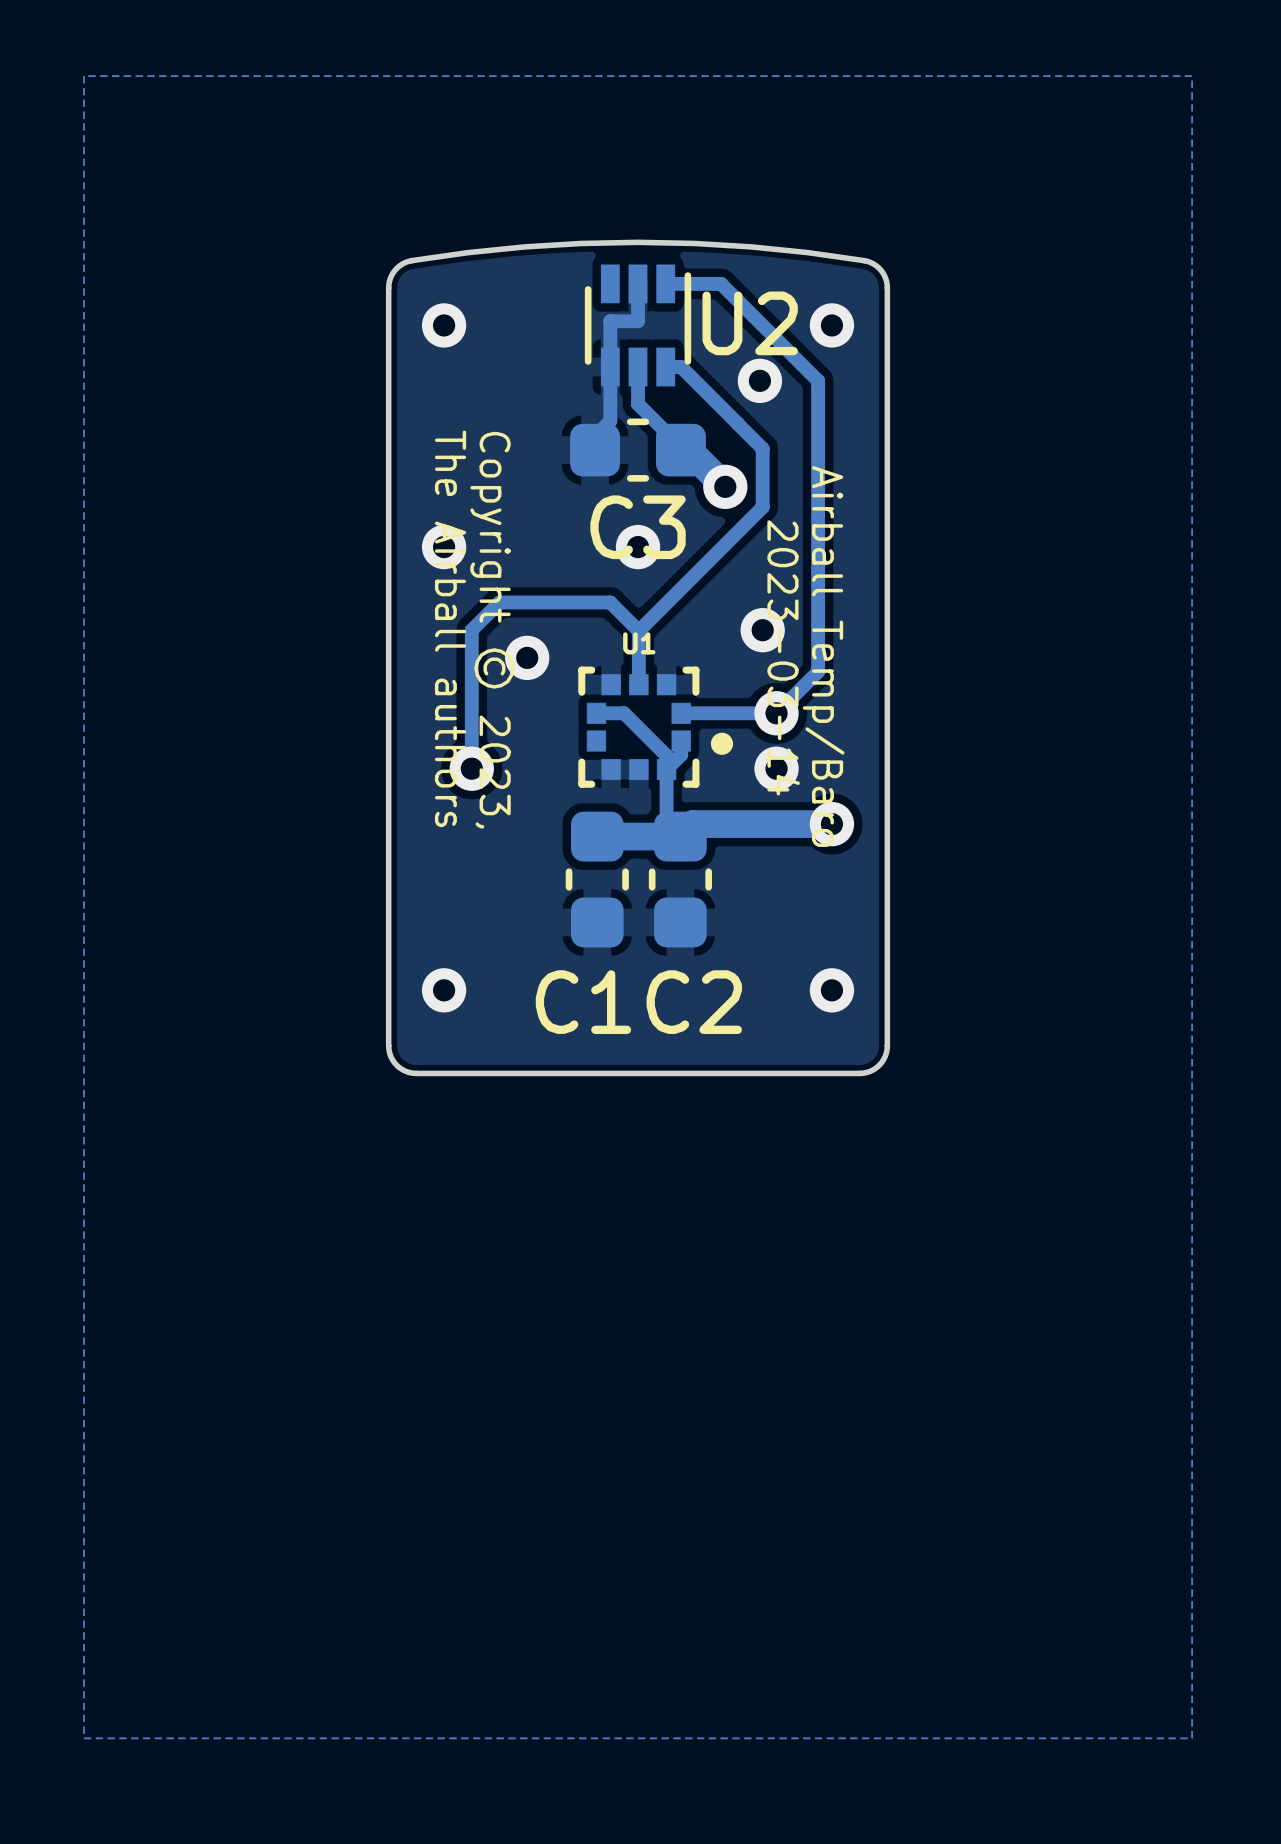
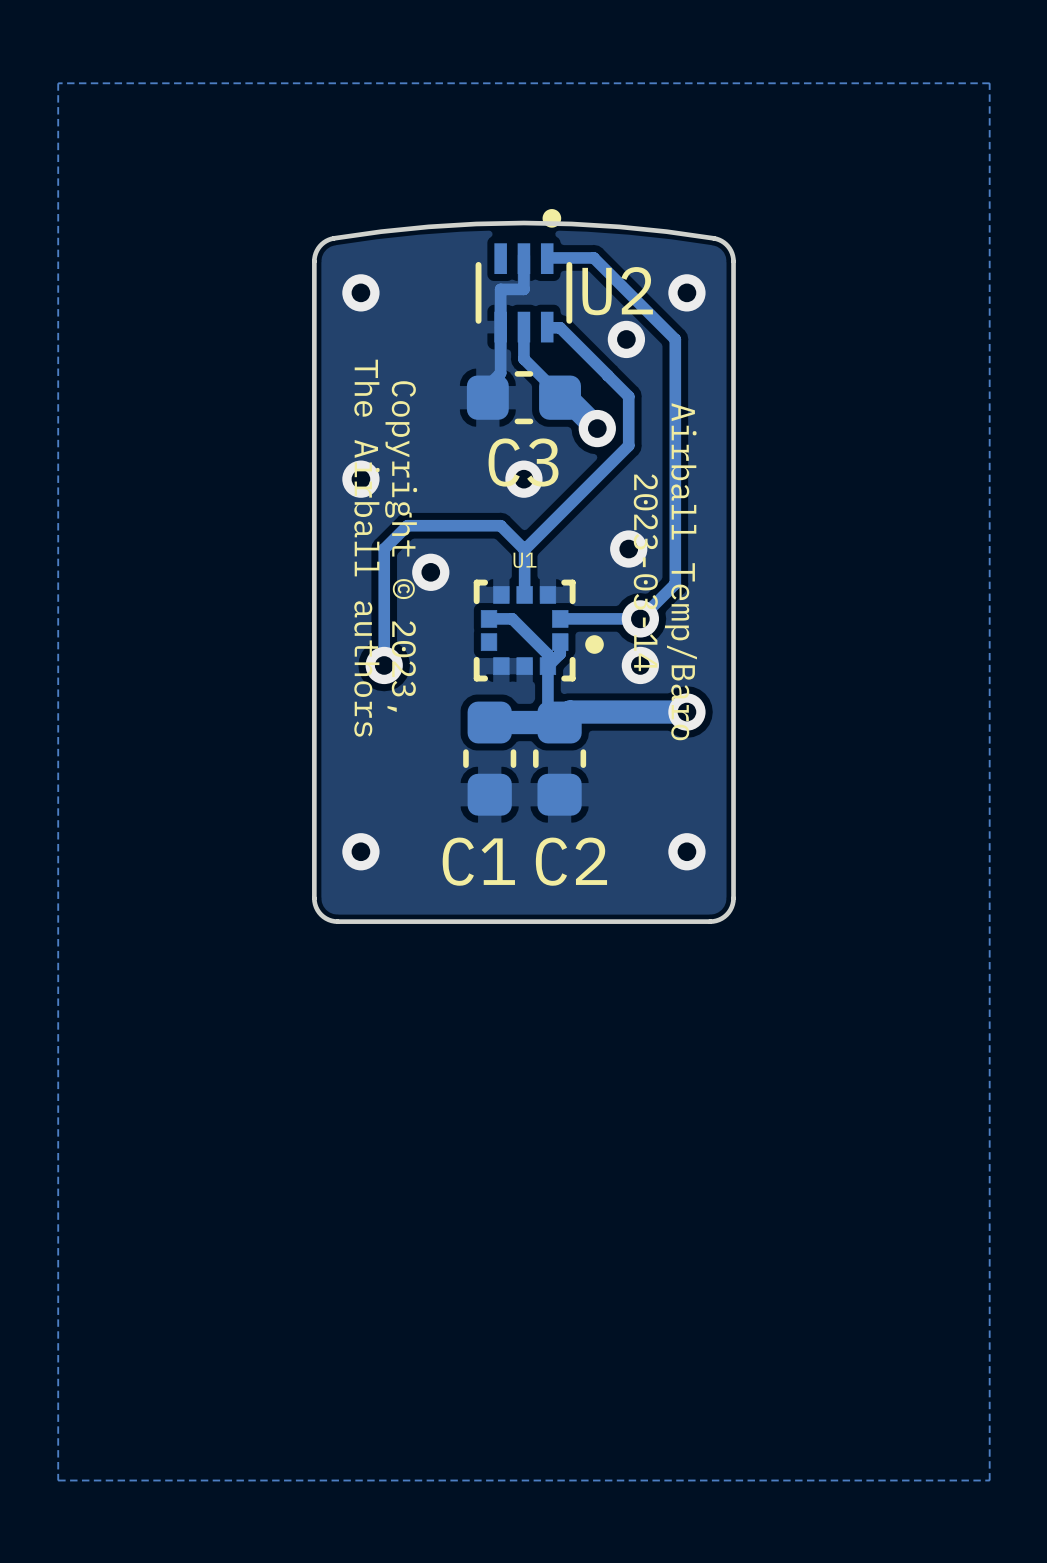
U2 footprint: [584, 264, 692, 387] -> [475, 209, 573, 343]

